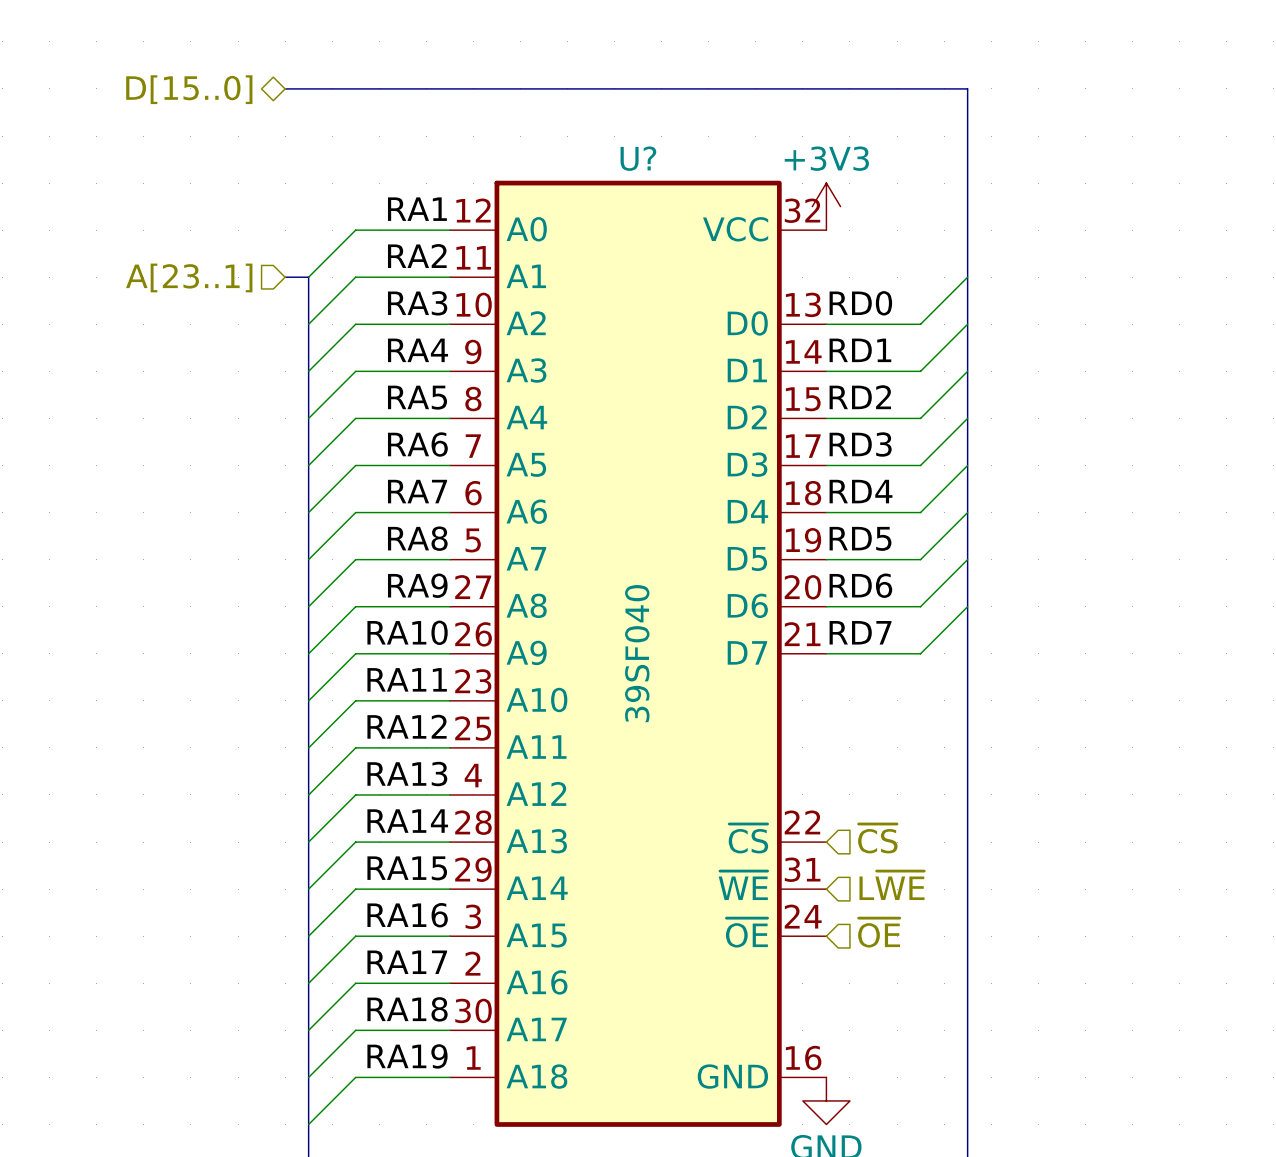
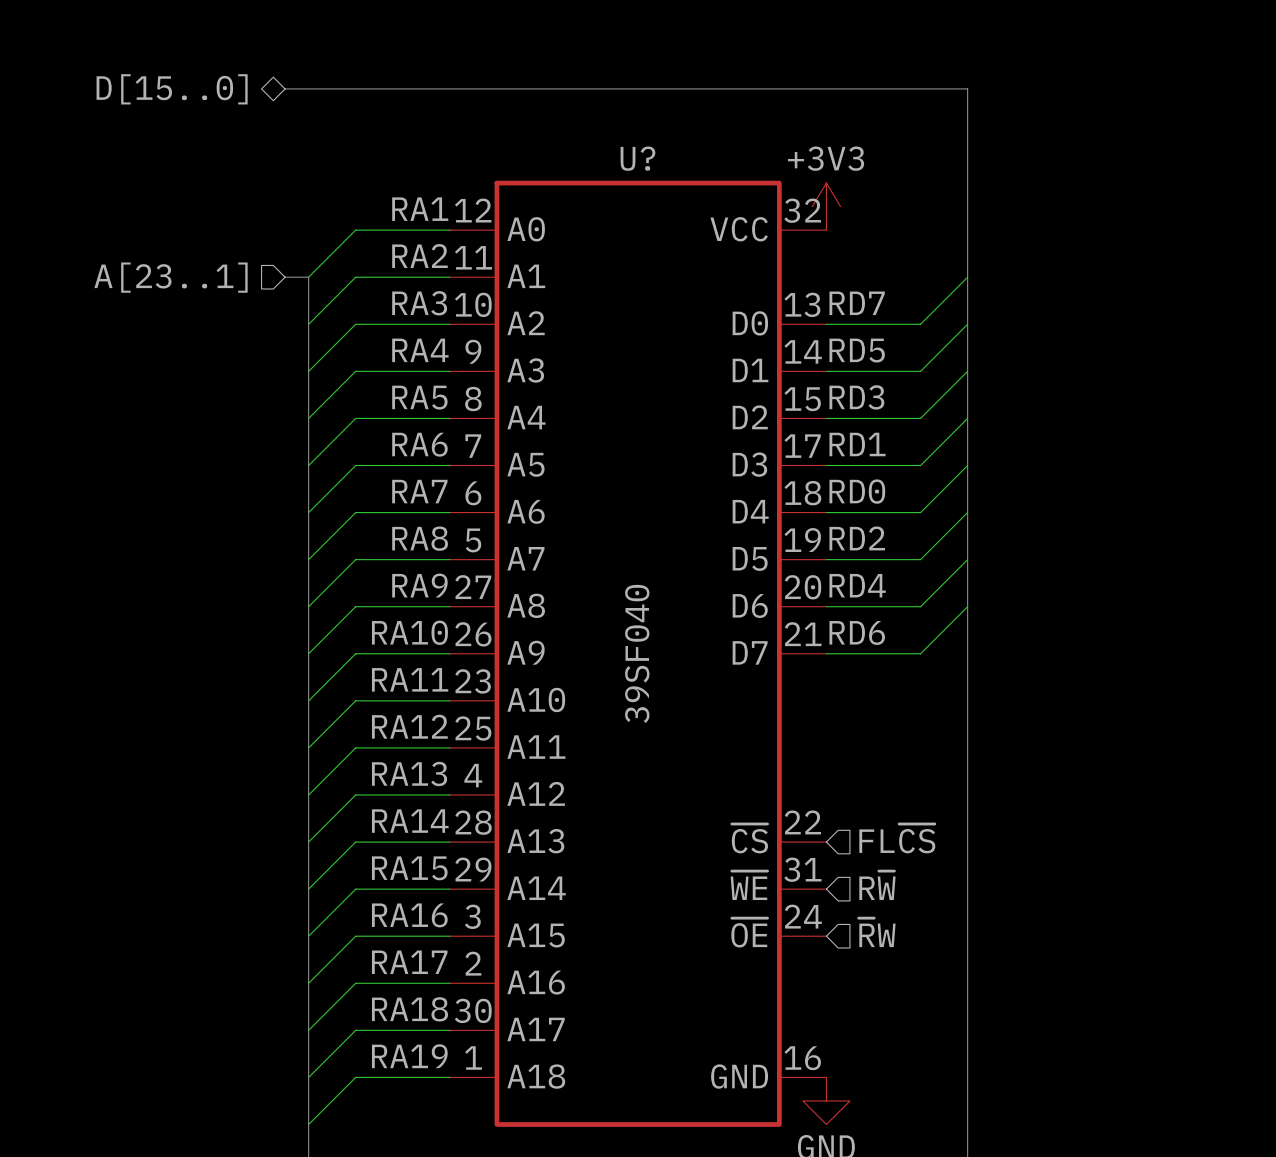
label: RD0 (860, 303) -> RD7 (857, 303)
label: RD1 (860, 350) -> RD5 (857, 350)
label: RD2 (860, 397) -> RD3 (856, 397)
label: RD3 (860, 444) -> RD1 (857, 444)
label: RD4 (861, 491) -> RD0 (857, 491)
label: RD5 (860, 538) -> RD2 (857, 538)
label: RD6 (860, 585) -> RD4 (857, 585)
label: RD7 (860, 632) -> RD6 (857, 632)
hierarchical label: ~{CS} (877, 838) -> FL~{CS} (897, 838)
hierarchical label: L~{WE} (892, 885) -> R~{W} (877, 885)
hierarchical label: ~{OE} (879, 932) -> ~{R}W (877, 932)

